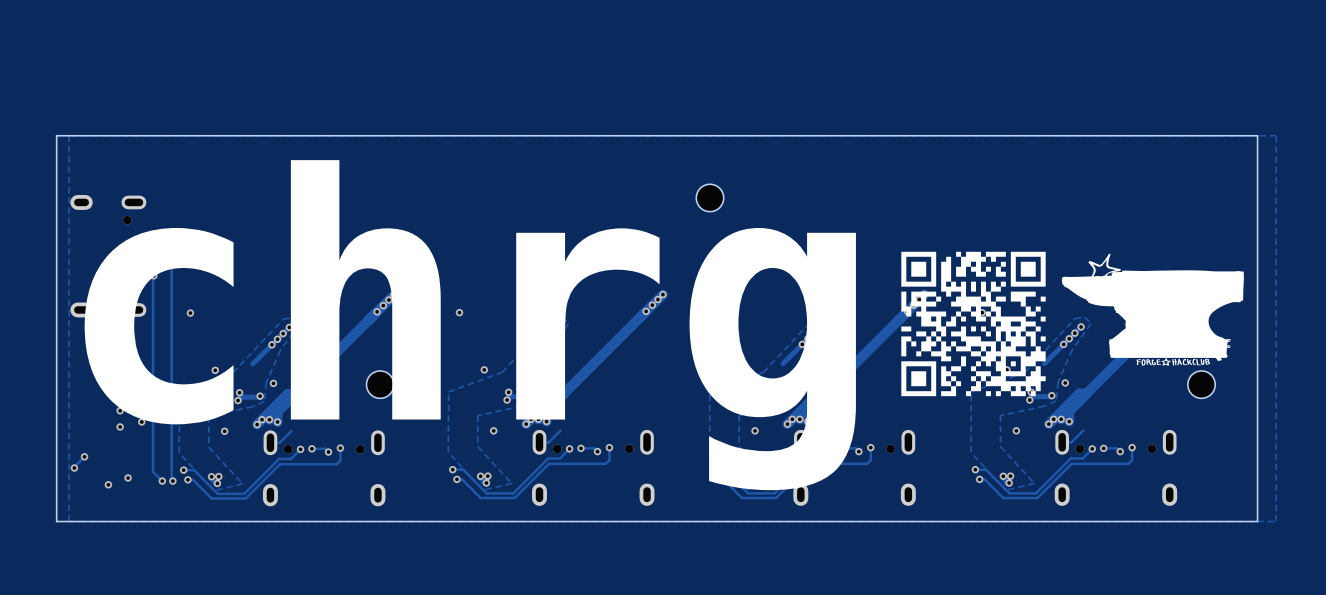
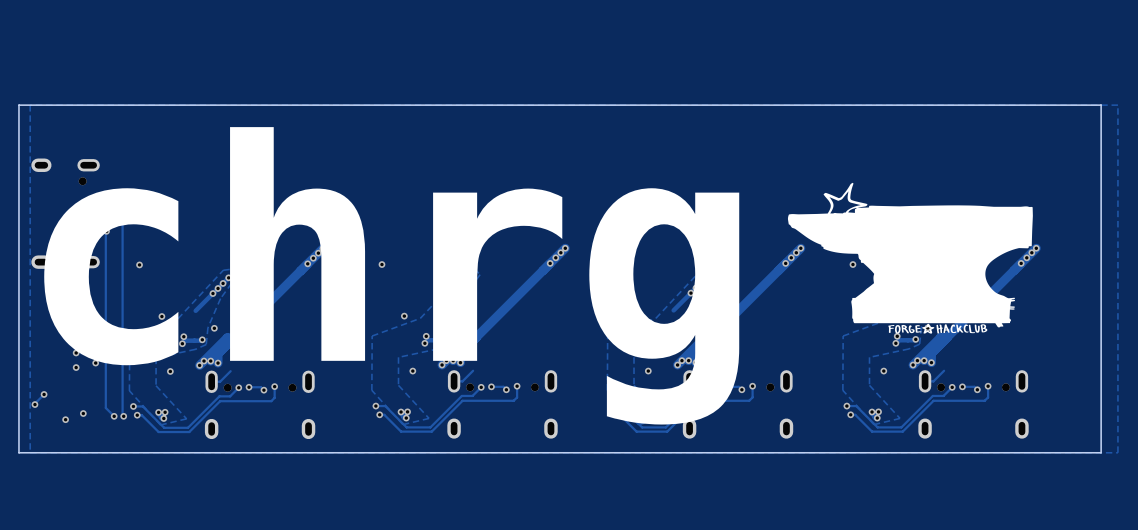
part: (709, 197) -> none
drawing: none -> [787, 182, 1033, 334]
drawing: [901, 251, 1046, 397] -> none
drawing: [1061, 253, 1244, 366] -> none
part: (380, 384) -> none
part: (1201, 384) -> none

